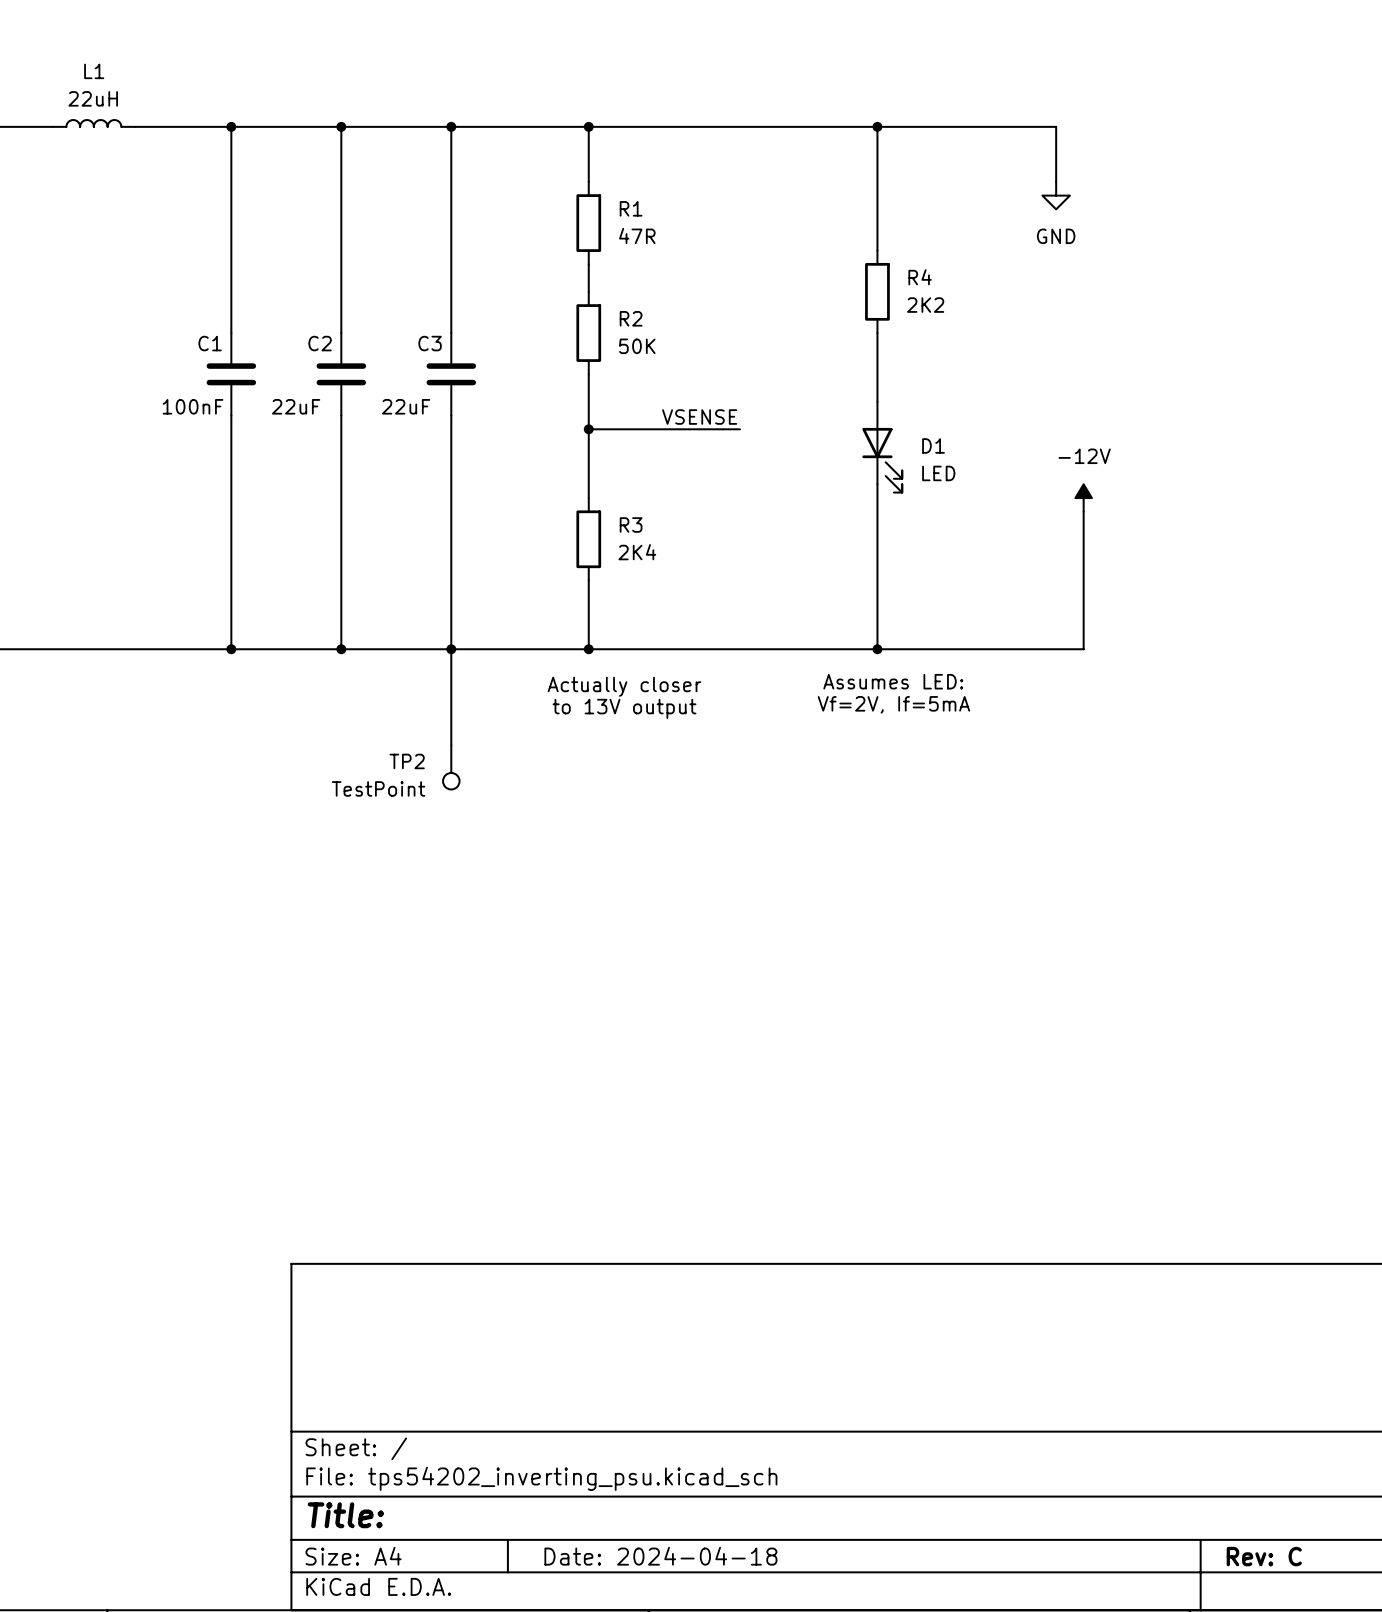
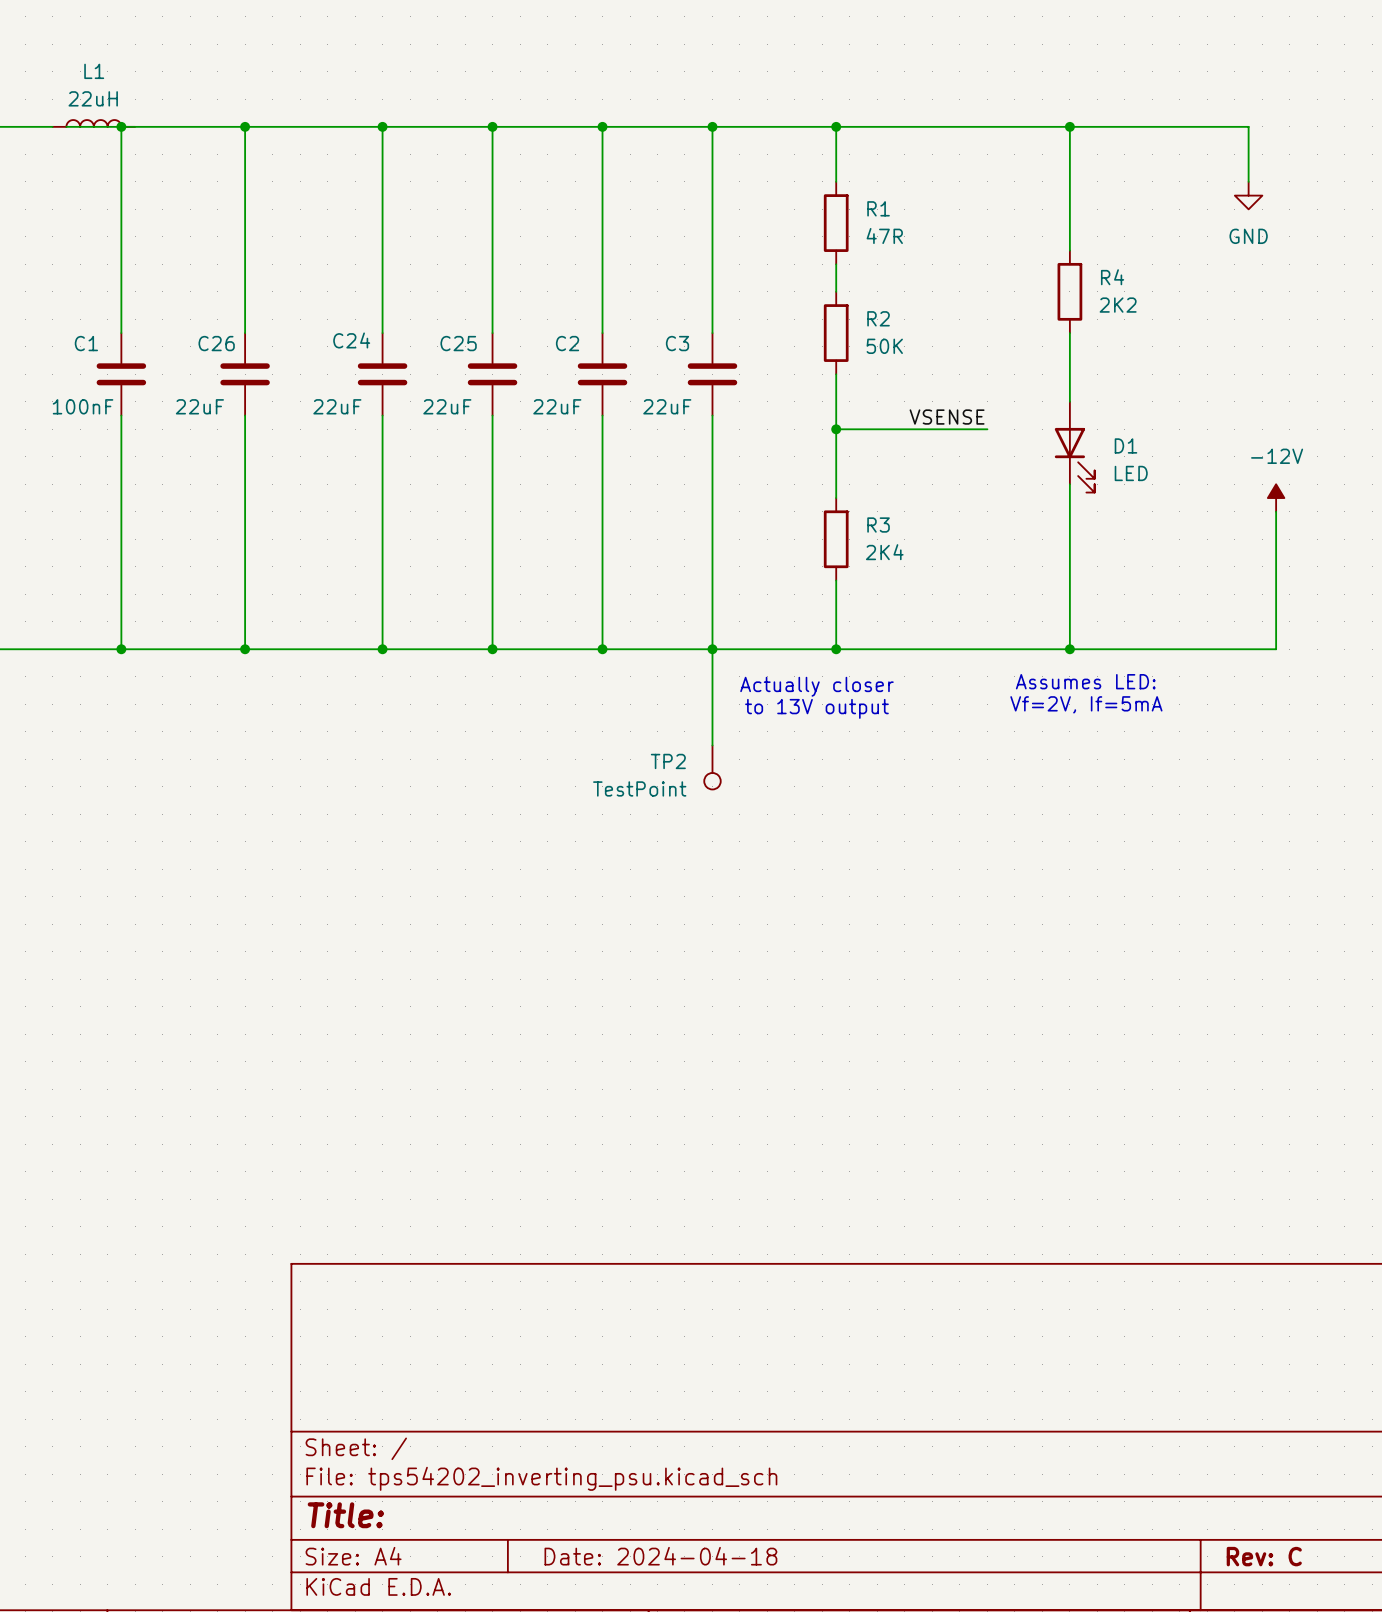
wire: none -> (66, 126) (135, 126)
wire: none -> (121, 126) (121, 333)
junction: none -> (121, 126)
wire: (231, 126) (231, 333) -> (492, 126) (492, 333)
junction position: (231, 126) -> (245, 126)
wire: none -> (245, 126) (245, 333)
wire: (341, 126) (341, 333) -> (602, 126) (602, 333)
junction: (341, 126) -> none
wire: none -> (382, 126) (382, 333)
junction: none -> (382, 126)
wire: (451, 126) (451, 333) -> (712, 126) (712, 333)
junction: (451, 126) -> none
junction: none -> (492, 126)
wire: (588, 126) (588, 181) -> (836, 126) (836, 181)
junction position: (588, 126) -> (602, 126)
junction: none -> (712, 126)
wire: (877, 126) (877, 250) -> (1069, 126) (1069, 250)
junction position: (877, 126) -> (836, 126)
wire: (1056, 126) (1056, 181) -> (1056, 126) (1248, 126) (1248, 181)
junction: none -> (1069, 126)
power symbol position: GND (1056, 195) -> GND (1248, 195)
R1 position: (588, 223) -> (836, 223)
wire: (588, 264) (588, 291) -> (836, 264) (836, 291)
R4 position: (877, 291) -> (1069, 291)
R2 position: (588, 333) -> (836, 333)
wire: (877, 333) (877, 401) -> (1069, 333) (1069, 401)
C1 name position: C1 (210, 343) -> C1 (86, 343)
C2 name position: C2 (320, 343) -> C2 (567, 343)
C3 name position: C3 (430, 343) -> C3 (677, 343)
C1 position: (231, 374) -> (121, 374)
C26: none -> 22uF (245, 374)
C2 position: (341, 374) -> (602, 374)
C24: none -> 22uF (382, 374)
C3 position: (451, 374) -> (712, 374)
C25: none -> 22uF (492, 374)
wire: (588, 374) (588, 498) -> (836, 374) (836, 498)
wire: none -> (121, 415) (121, 649)
wire: (231, 415) (231, 649) -> (492, 415) (492, 649)
wire: none -> (245, 415) (245, 649)
wire: (341, 415) (341, 649) -> (602, 415) (602, 649)
wire: none -> (382, 415) (382, 649)
wire: (451, 415) (451, 745) -> (712, 415) (712, 745)
label position: VSENSE (699, 417) -> VSENSE (947, 417)
wire: (588, 429) (739, 429) -> (836, 429) (987, 429)
junction: (588, 429) -> none
junction: none -> (836, 429)
D1 position: (882, 447) -> (1074, 447)
wire: (877, 484) (877, 649) -> (1069, 484) (1069, 649)
power symbol position: -12V (1083, 498) -> -12V (1276, 498)
wire: (1083, 511) (1083, 649) -> (1276, 511) (1276, 649) (1083, 649)
R3 position: (588, 539) -> (836, 539)
wire: (588, 580) (588, 649) -> (836, 580) (836, 649)
junction: none -> (121, 649)
junction position: (231, 649) -> (245, 649)
junction: (341, 649) -> none
junction: none -> (382, 649)
junction: (451, 649) -> none
junction: none -> (492, 649)
junction position: (588, 649) -> (602, 649)
junction: none -> (712, 649)
junction position: (877, 649) -> (836, 649)
junction: none -> (1069, 649)
text position: Assumes LED: (893, 681) -> Assumes LED: (1085, 681)
text position: Actually closer (624, 686) -> Actually closer (816, 686)
text position: Vf=2V, If=5mA (893, 704) -> Vf=2V, If=5mA (1086, 704)
text position: to 13V output (624, 708) -> to 13V output (816, 708)
TP2 position: (451, 767) -> (712, 767)

